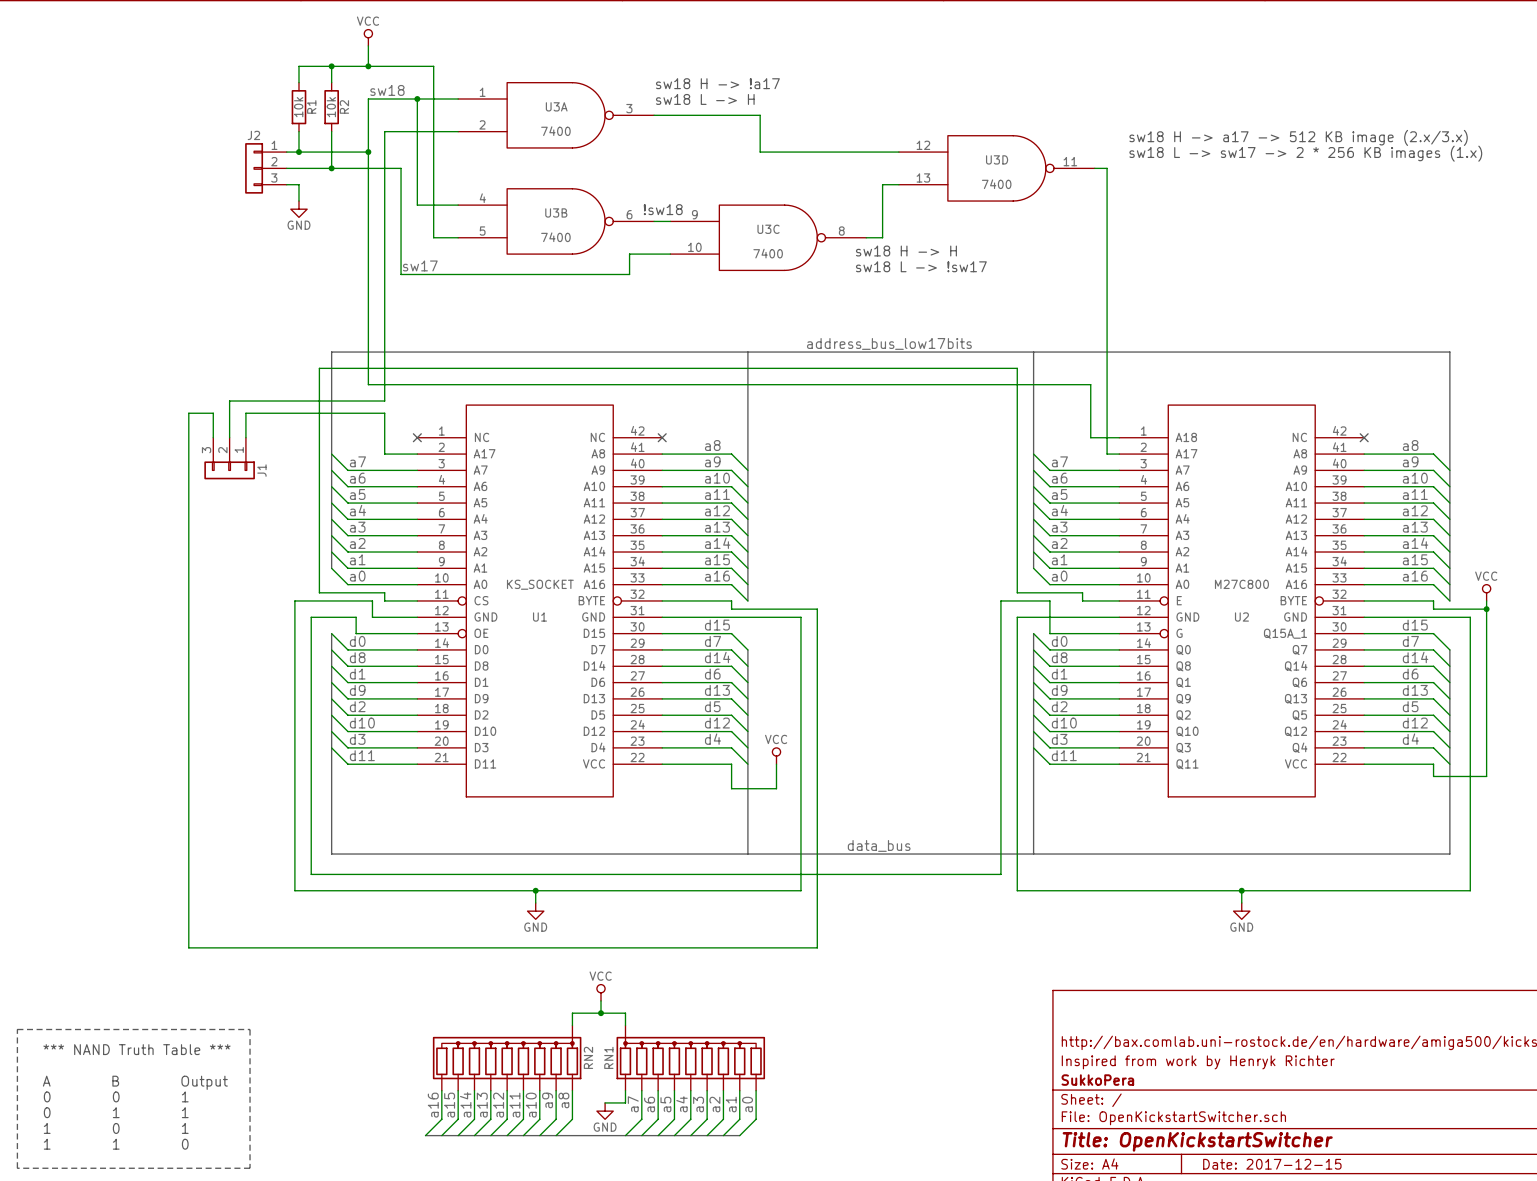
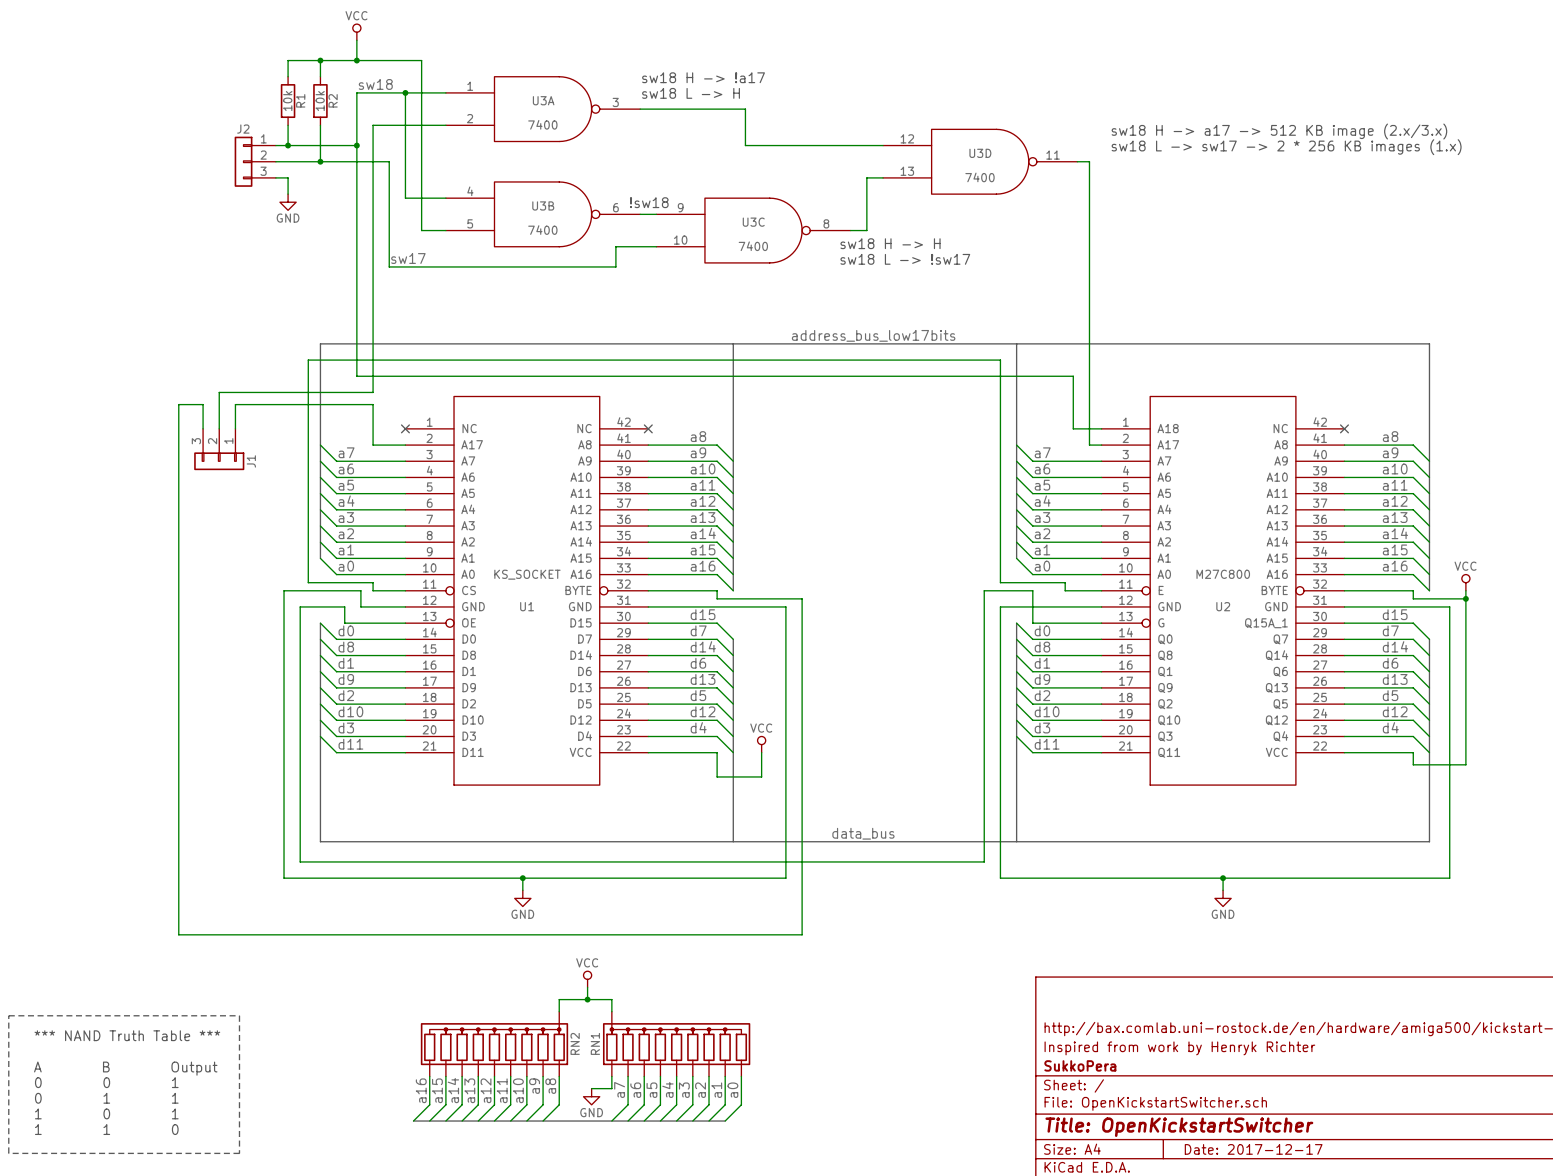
title block: Date: 2017-12-15 (1272, 1164) -> Date: 2017-12-17 (1253, 1149)

